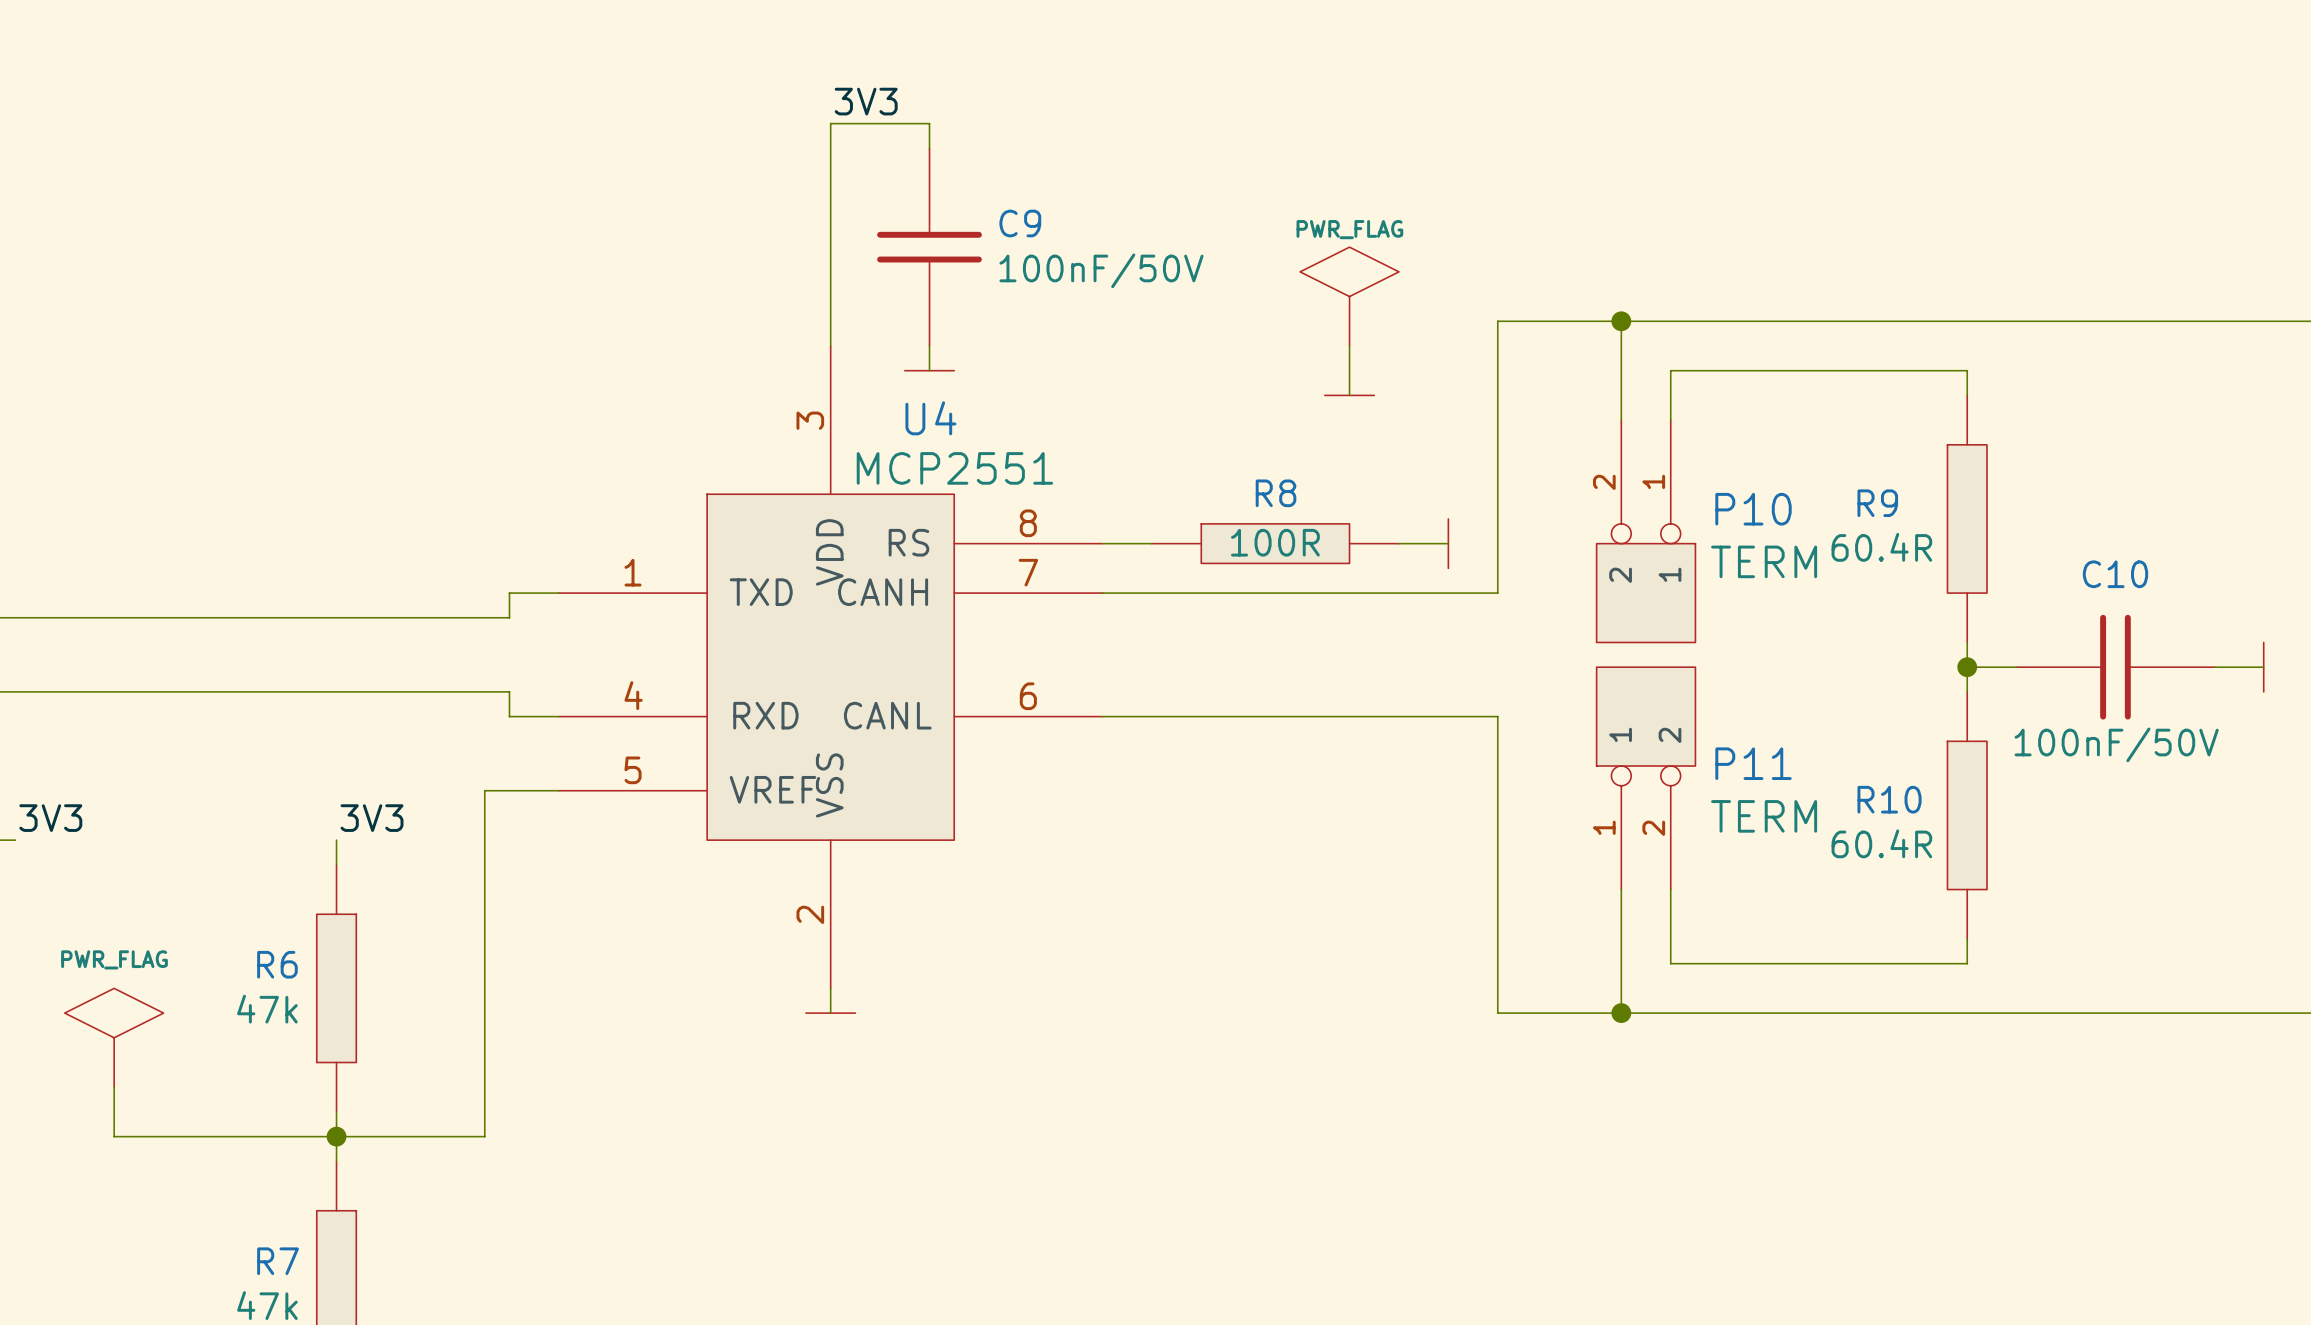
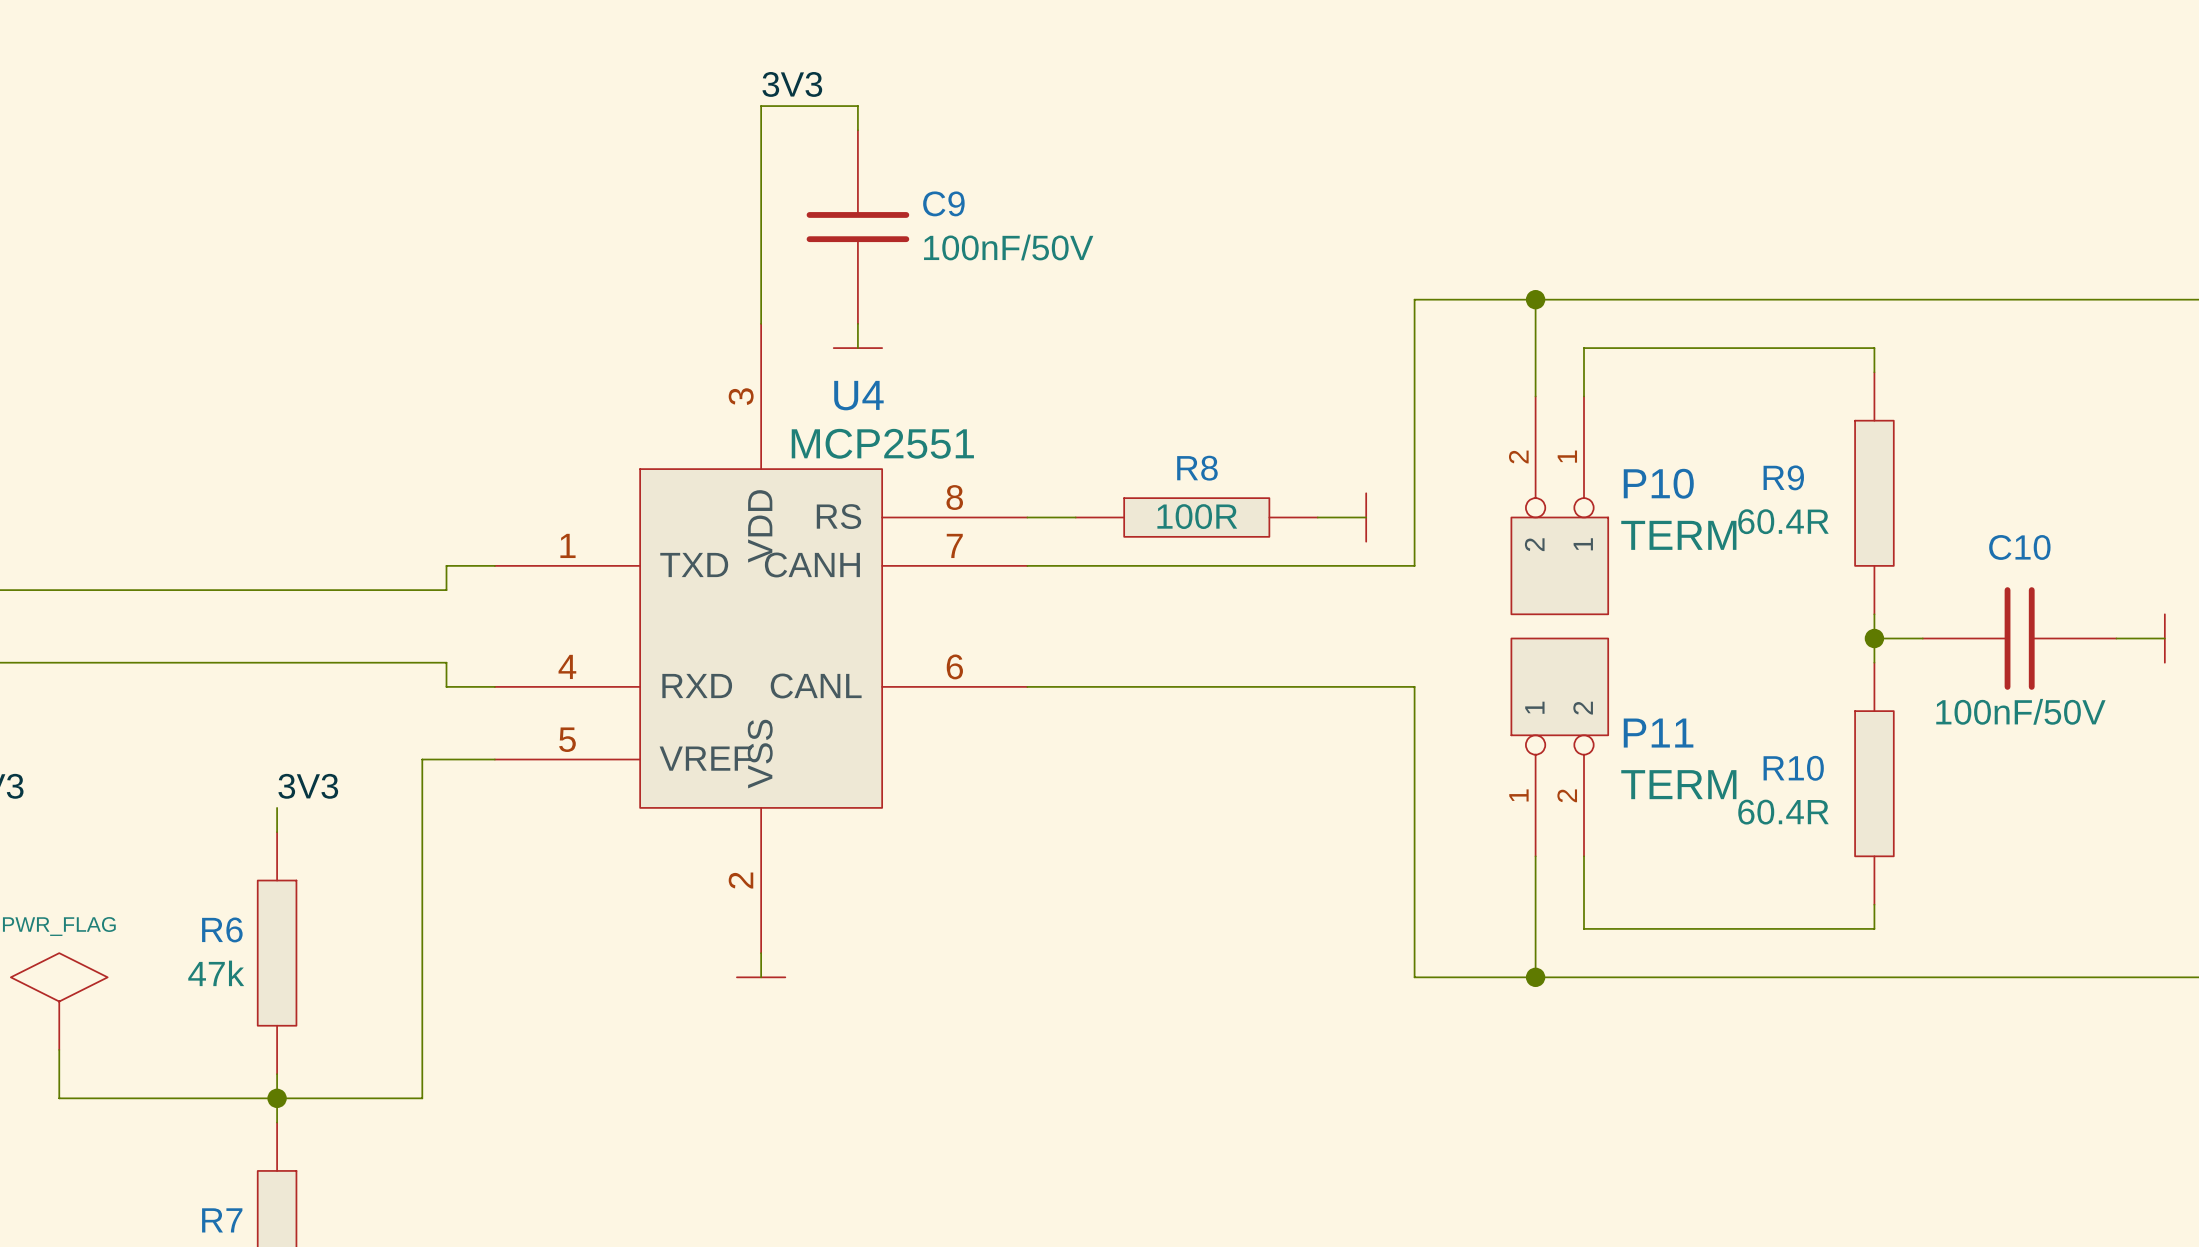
power symbol: PWR_FLAG (1349, 296) -> none
wire: (1349, 345) (1349, 395) -> none
power symbol: (1349, 395) -> none

